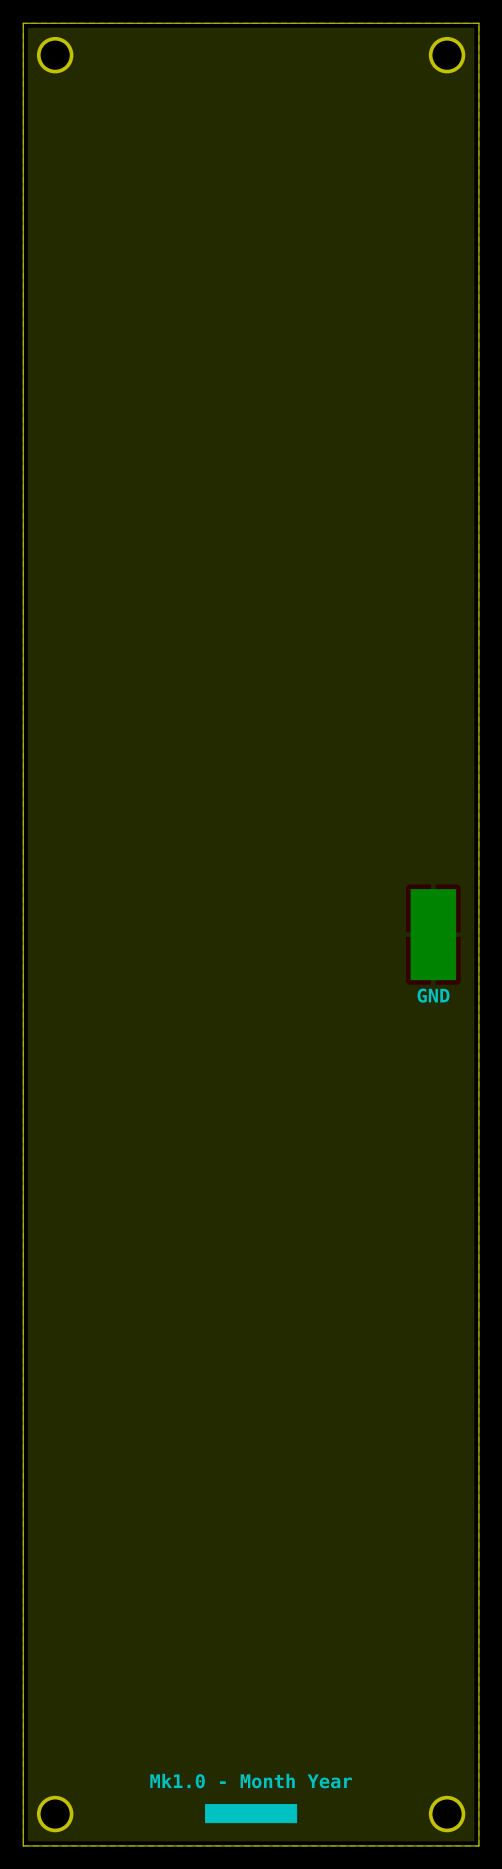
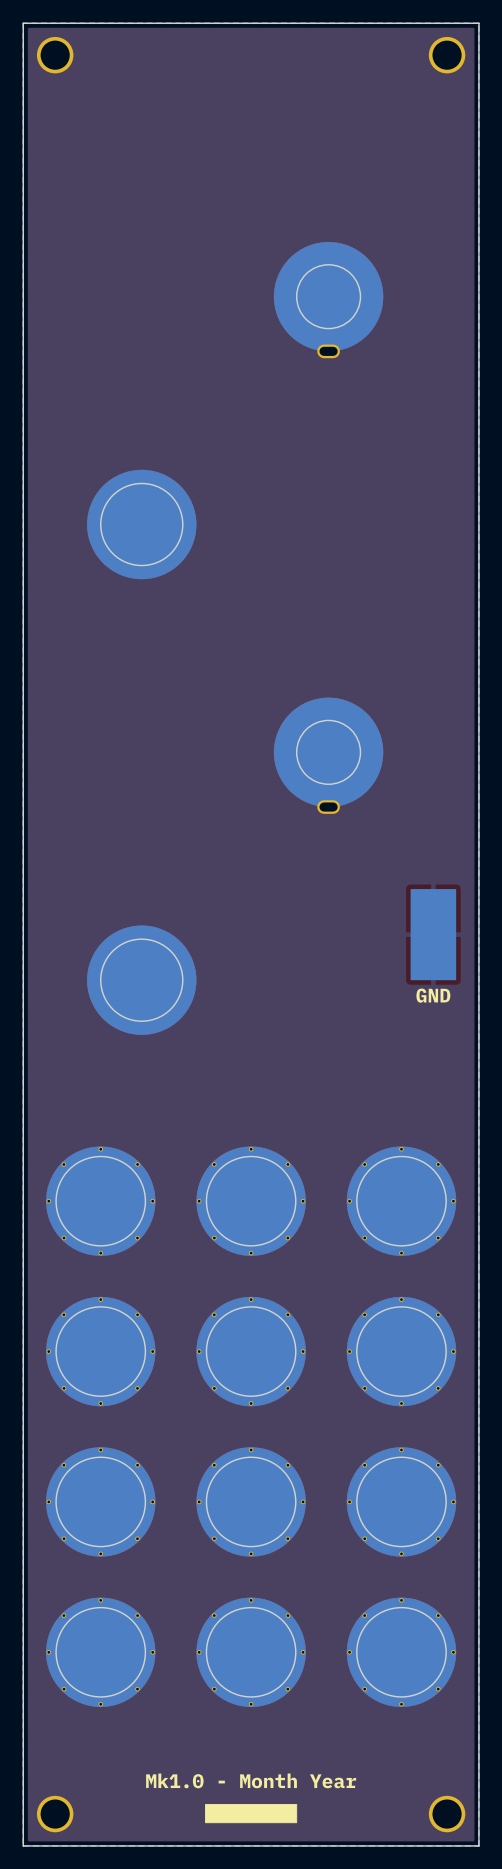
part: none -> (328, 300)
part: none -> (141, 524)
part: none -> (328, 755)
part: none -> (141, 980)
part: none -> (100, 1201)
part: none -> (251, 1201)
part: none -> (401, 1201)
part: none -> (100, 1351)
part: none -> (251, 1351)
part: none -> (401, 1351)
part: none -> (100, 1501)
part: none -> (251, 1501)
part: none -> (401, 1501)
part: none -> (100, 1652)
part: none -> (251, 1652)
part: none -> (401, 1652)

